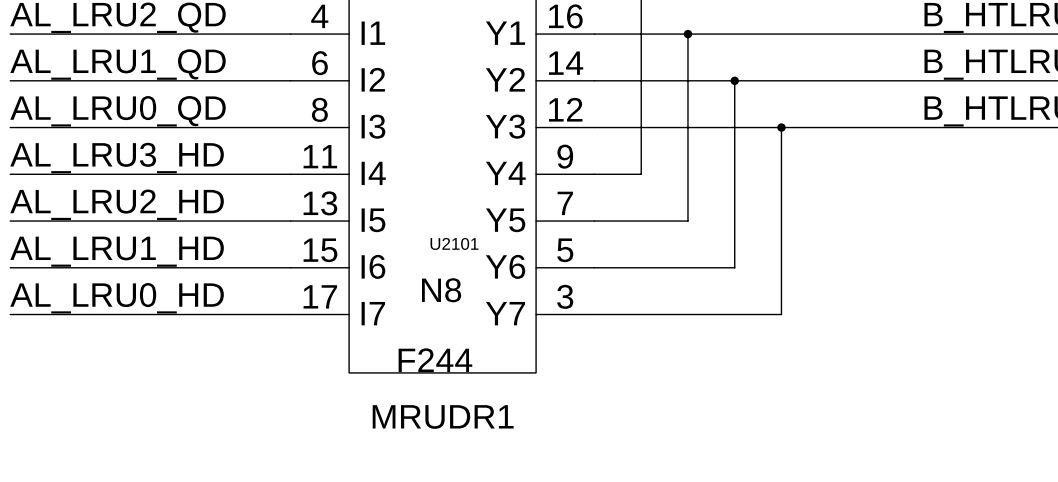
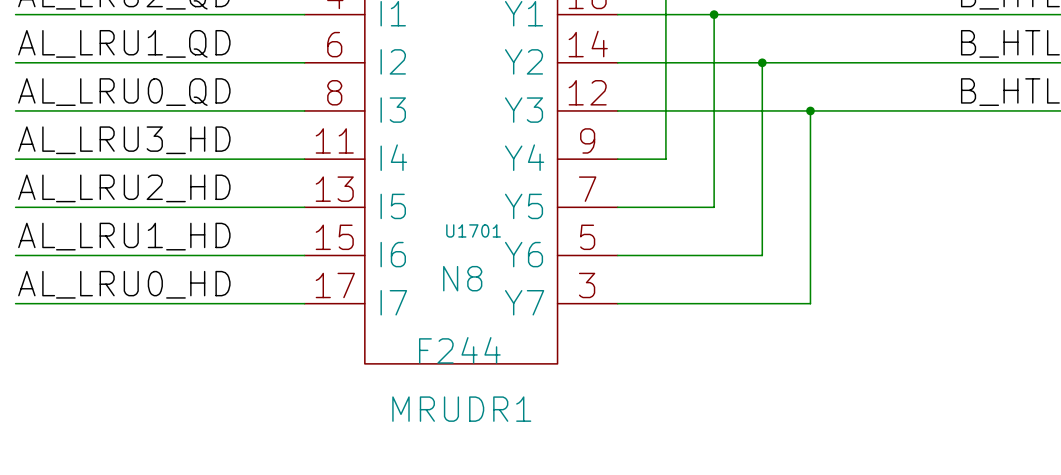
U2101 name: U2101 (454, 243) -> U1701 (473, 230)

